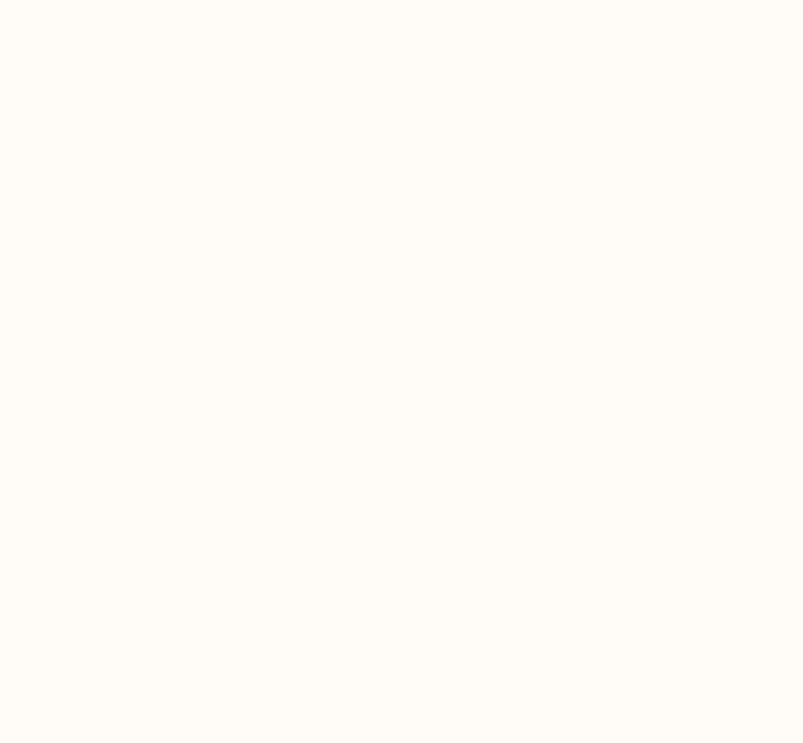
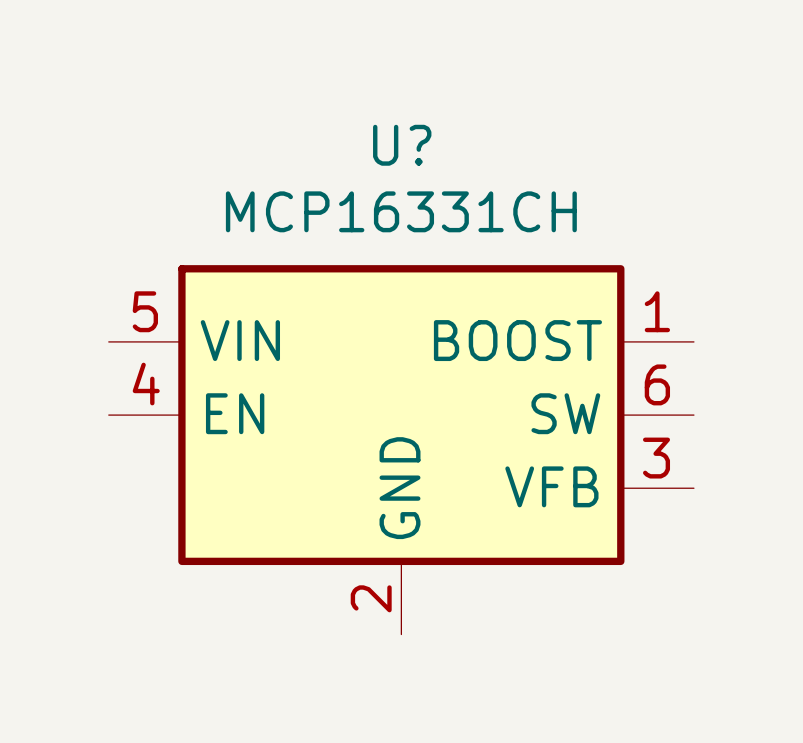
U?: none -> MCP16331CH (401, 449)

